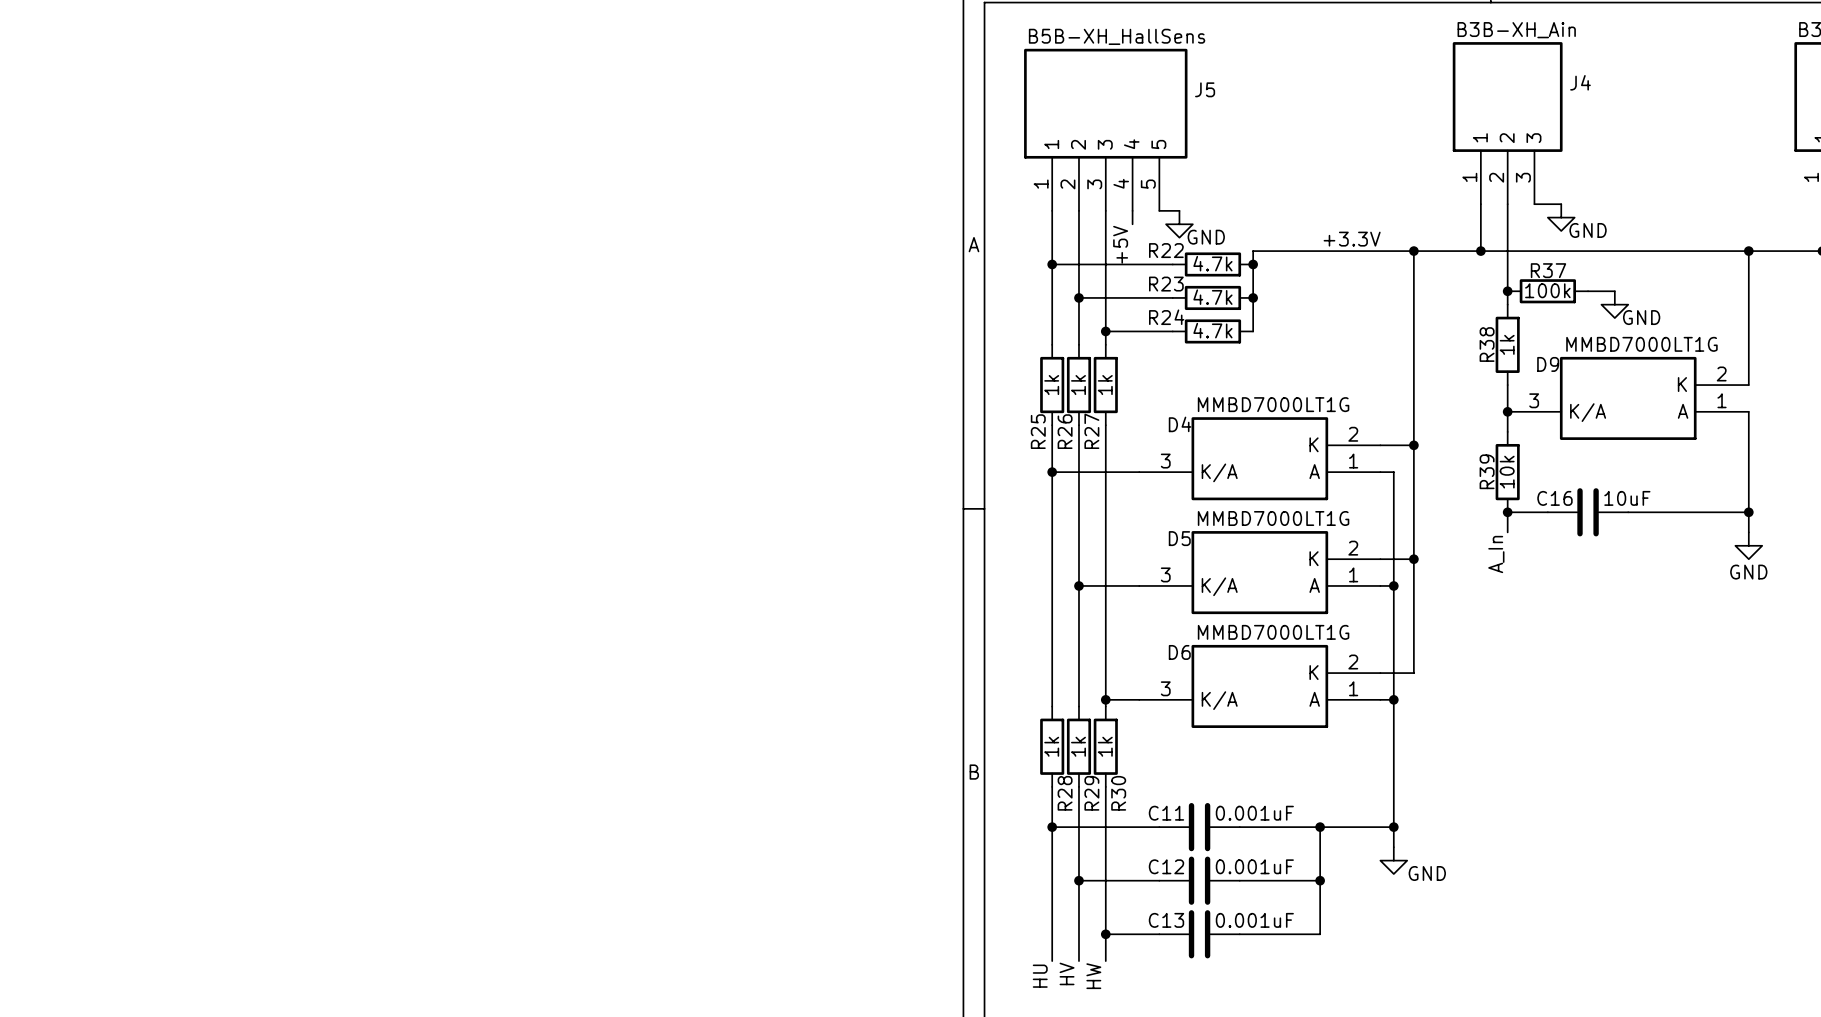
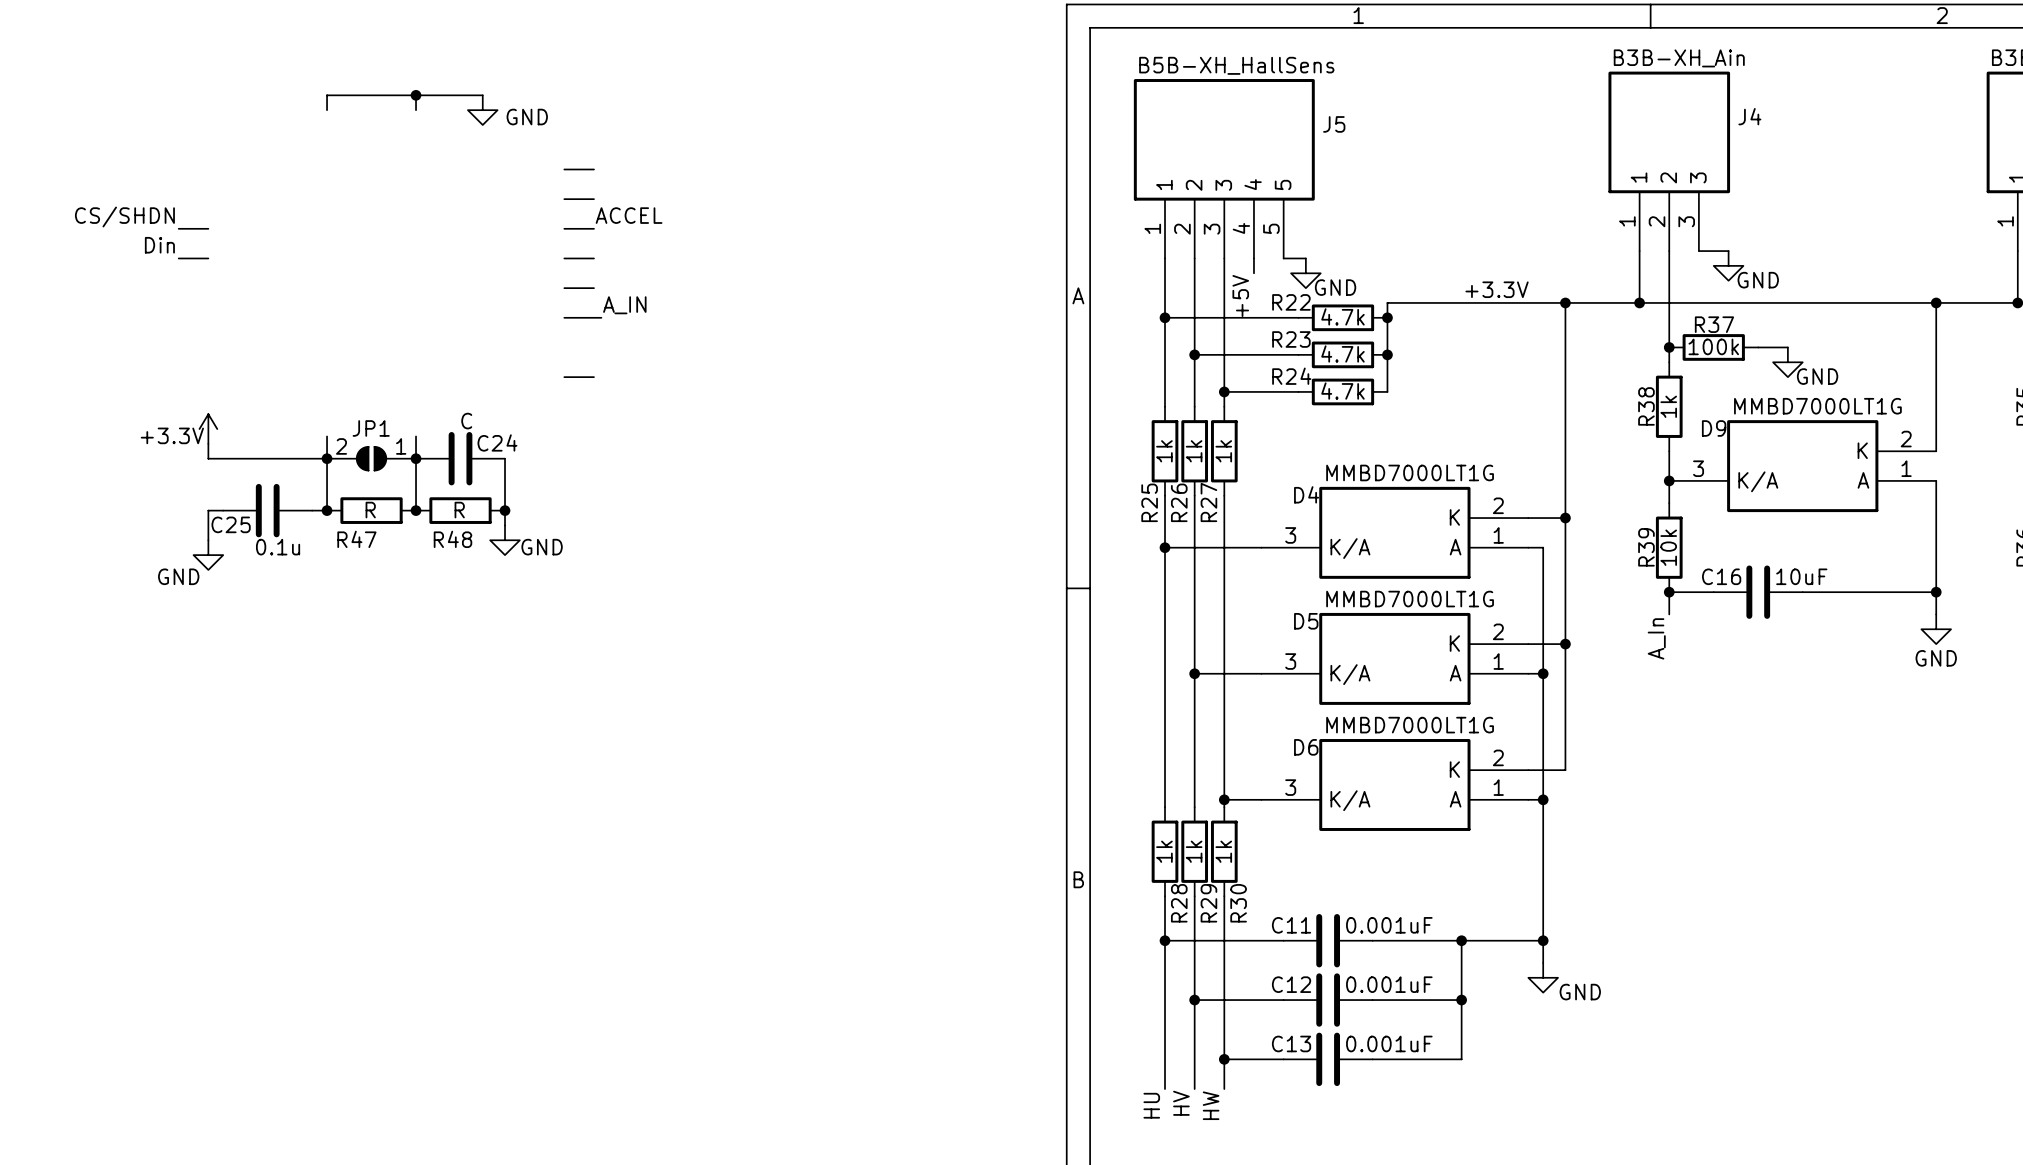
wire: none -> (416, 95) (416, 110)
junction: none -> (416, 95)
wire: none -> (482, 95) (327, 95) (327, 110)
power symbol: none -> GND (482, 110)
wire: none -> (564, 169) (593, 169)
wire: none -> (564, 199) (593, 199)
label: none -> ACCEL (629, 215)
label: none -> CS/SHDN (124, 216)
wire: none -> (178, 228) (208, 228)
wire: none -> (564, 228) (593, 228)
label: none -> Din (159, 245)
wire: none -> (178, 258) (208, 258)
wire: none -> (564, 258) (593, 258)
wire: none -> (564, 288) (593, 288)
label: none -> A_IN (624, 305)
wire: none -> (564, 317) (601, 317)
wire: none -> (564, 377) (593, 377)
power symbol: none -> +3.3V (208, 429)
wire: none -> (327, 436) (327, 510) (312, 510)
wire: none -> (416, 436) (416, 510)
wire: none -> (208, 443) (208, 458) (327, 458)
junction: none -> (327, 458)
JP1: none -> (371, 458)
junction: none -> (416, 458)
C24: none -> C (460, 458)
wire: none -> (505, 458) (505, 525)
wire: none -> (223, 510) (208, 510) (208, 540)
C25: none -> 0.1u (267, 510)
junction: none -> (327, 510)
R47: none -> R (371, 510)
junction: none -> (416, 510)
R48: none -> R (460, 510)
junction: none -> (505, 510)
power symbol: none -> GND (505, 540)
power symbol: none -> GND (208, 555)

